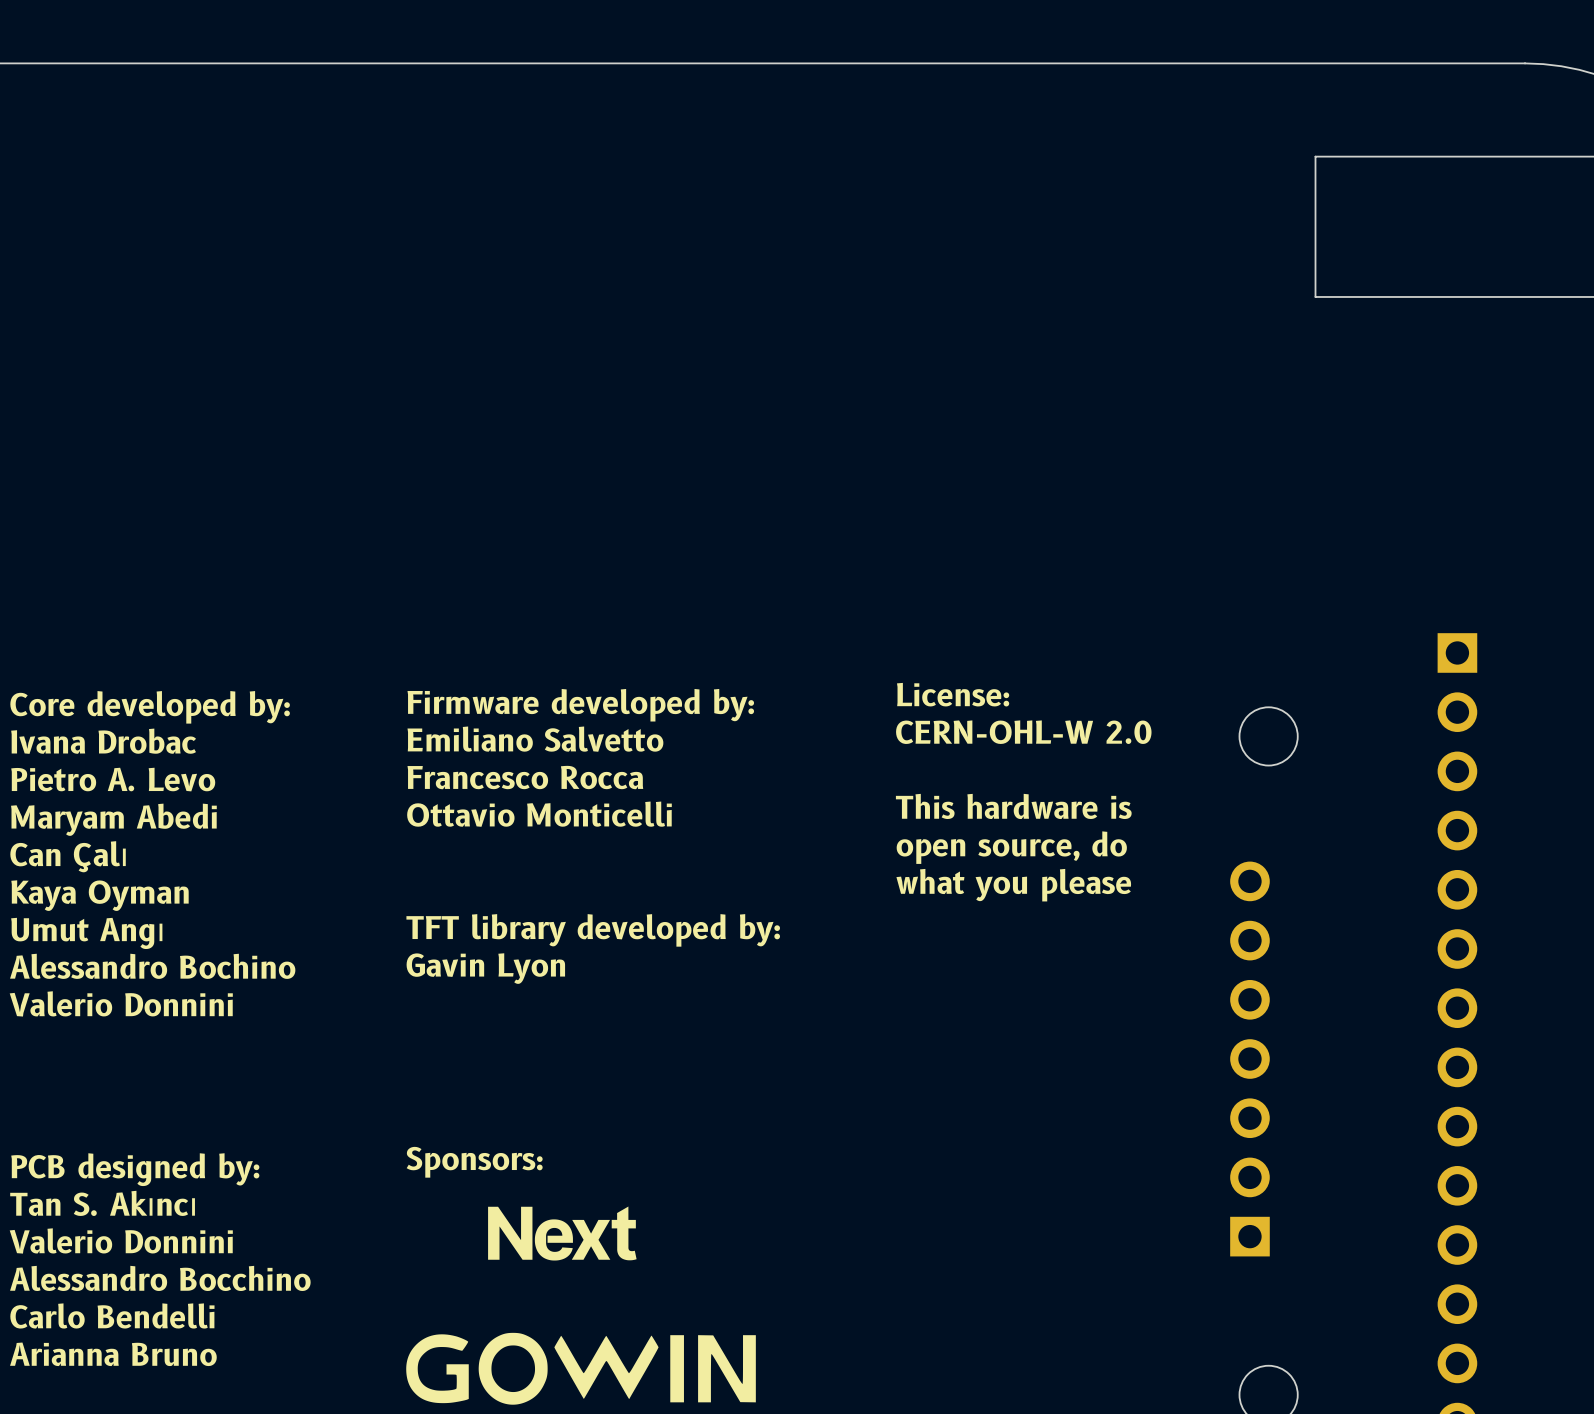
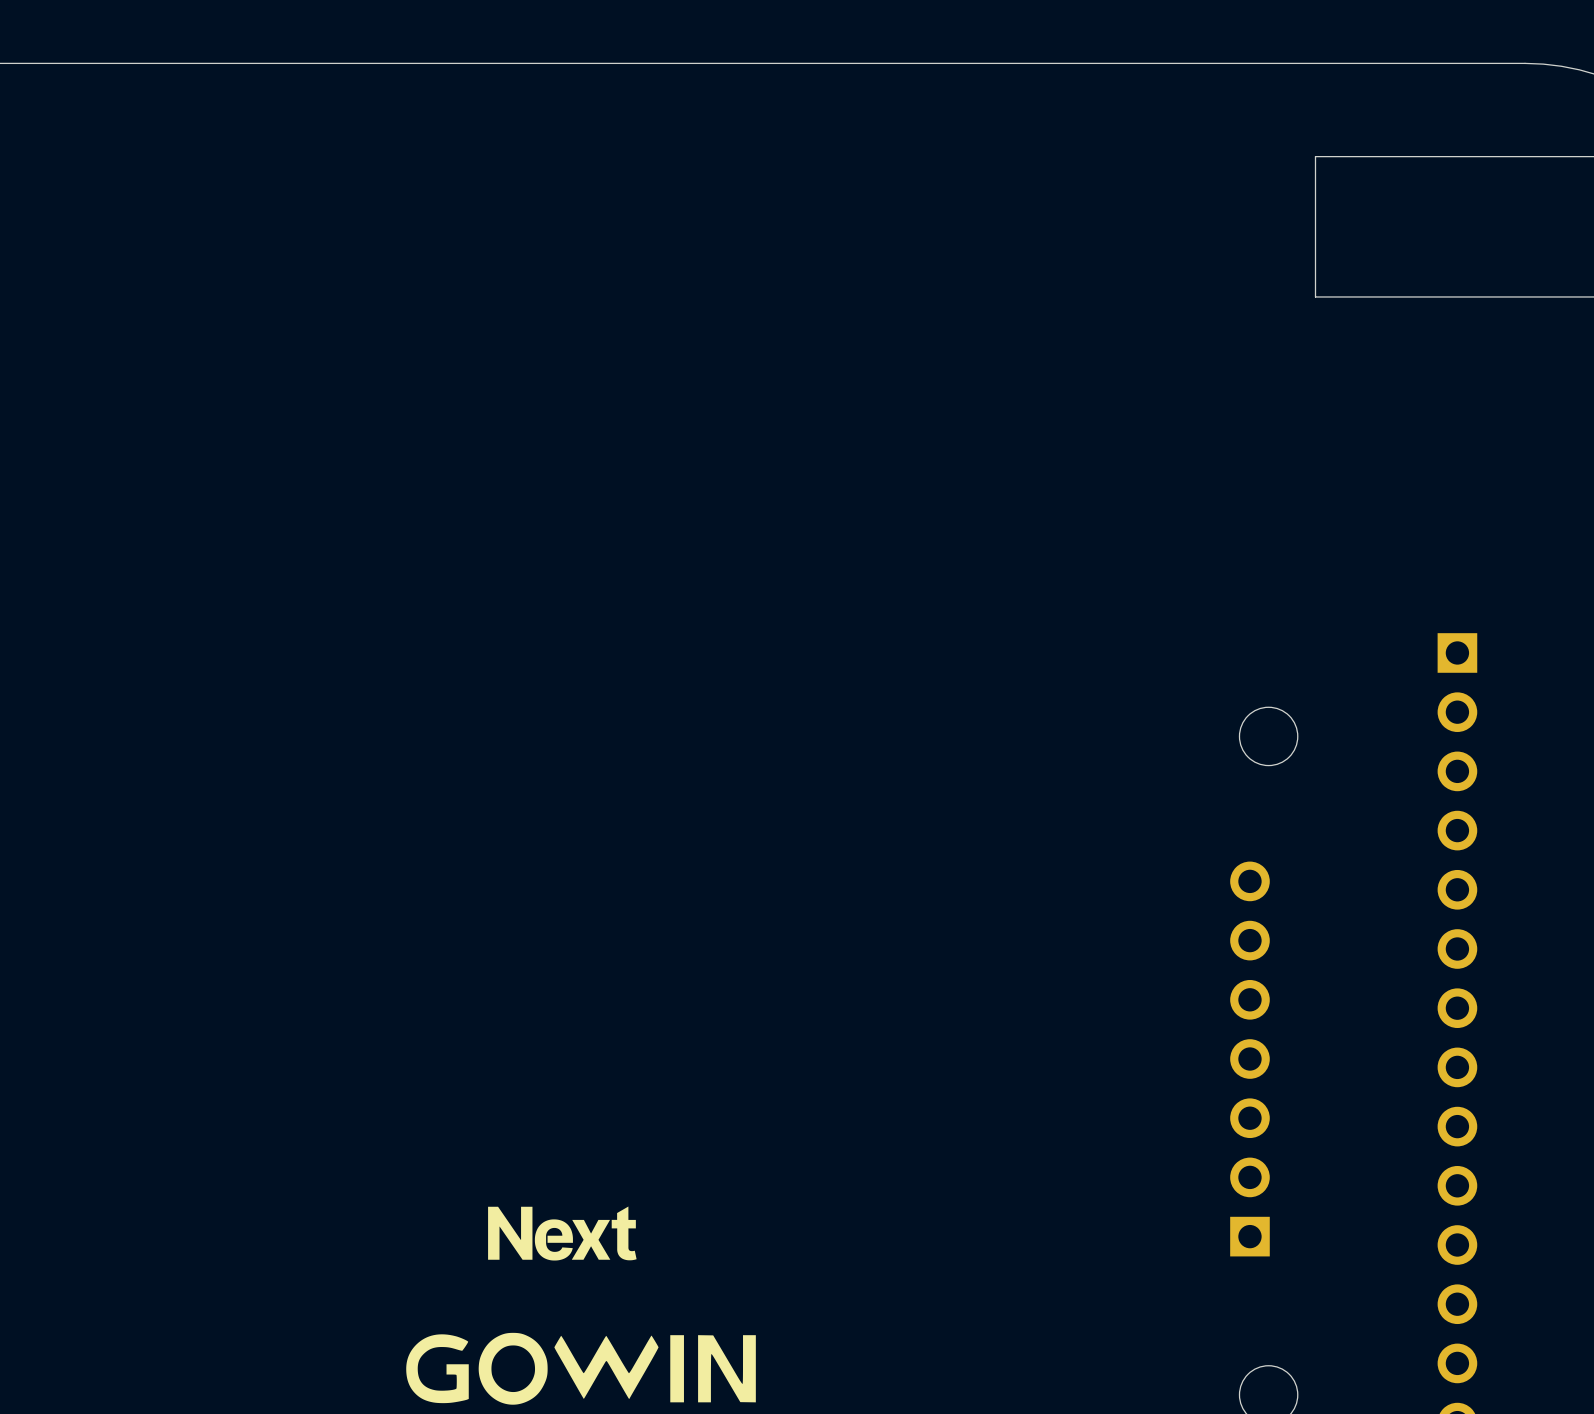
text: License: (953, 694) -> none
text: Firmware developed by: (580, 705) -> none
text: Core developed by: (150, 707) -> none
text: CERN-OHL-W 2.0 (1023, 732) -> none
text: Emiliano Salvetto (535, 739) -> none
text: Ivana Drobac (103, 741) -> none
text: Francesco Rocca (525, 777) -> none
text: Pietro A. Levo (113, 779) -> none
text: This hardware is (1013, 806) -> none
text: Ottavio Monticelli (539, 814) -> none
text: Maryam Abedi (113, 819) -> none
text: open source, do (1011, 847) -> none
text: Can Çalı (68, 856) -> none
text: what you please (1013, 885) -> none
text: Kaya Oyman (99, 895) -> none
text: TFT library developed by: (593, 930) -> none
text: Umut Angı (86, 933) -> none
text: Alessandro Bochino (152, 966) -> none
text: Gavin Lyon (485, 968) -> none
text: Valerio Donnini (121, 1003) -> none
text: Sponsors: (474, 1162) -> none
text: PCB designed by: (135, 1169) -> none
text: Tan S. Akıncı (102, 1203) -> none
text: Valerio Donnini (121, 1240) -> none
text: Alessandro Bocchino (160, 1278) -> none
text: Carlo Bendelli (112, 1315) -> none
text: Arianna Bruno (113, 1354) -> none

